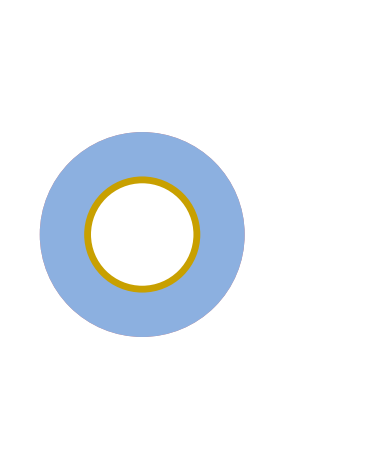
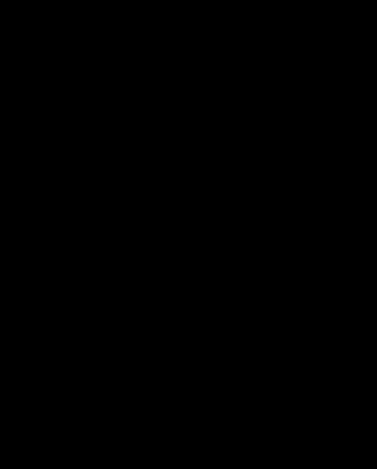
part: (142, 234) -> none

